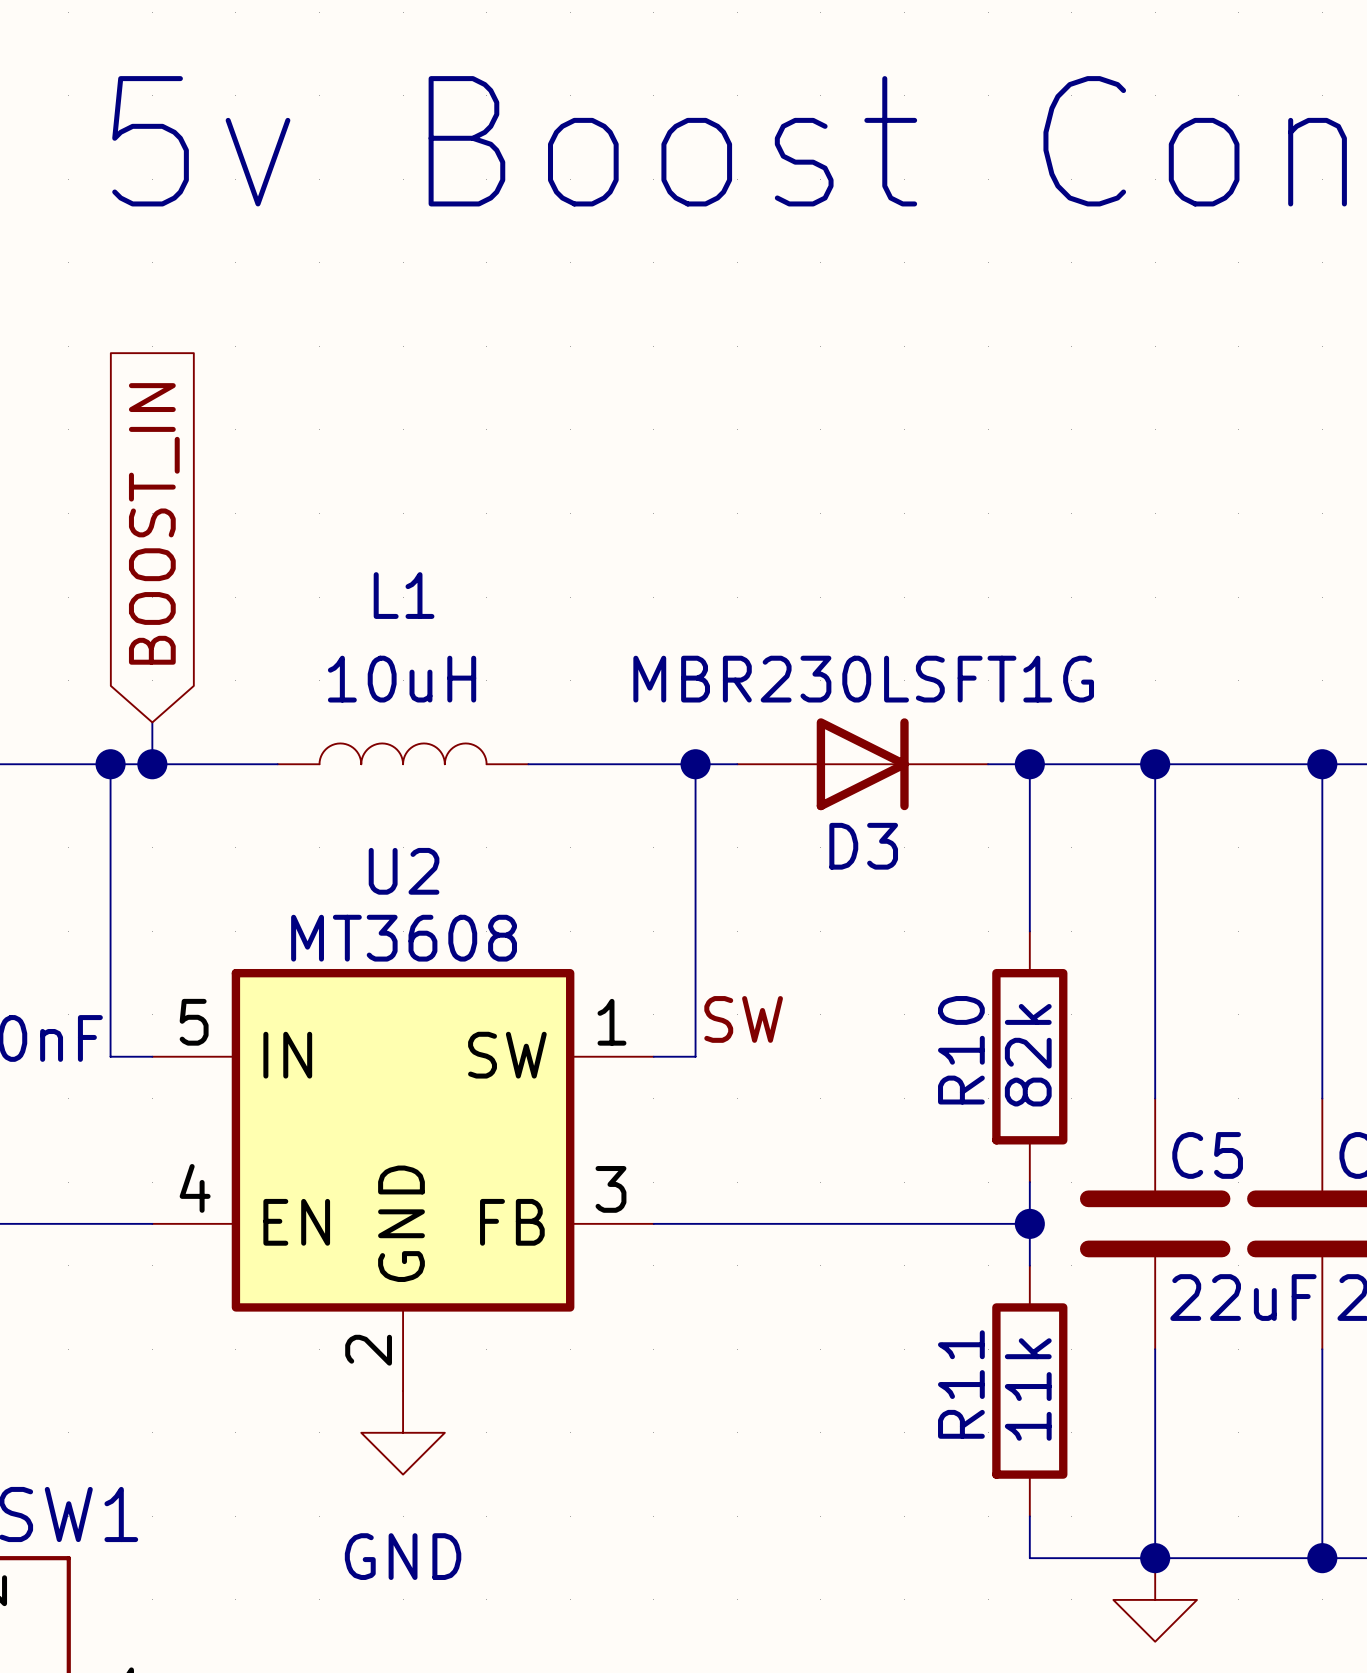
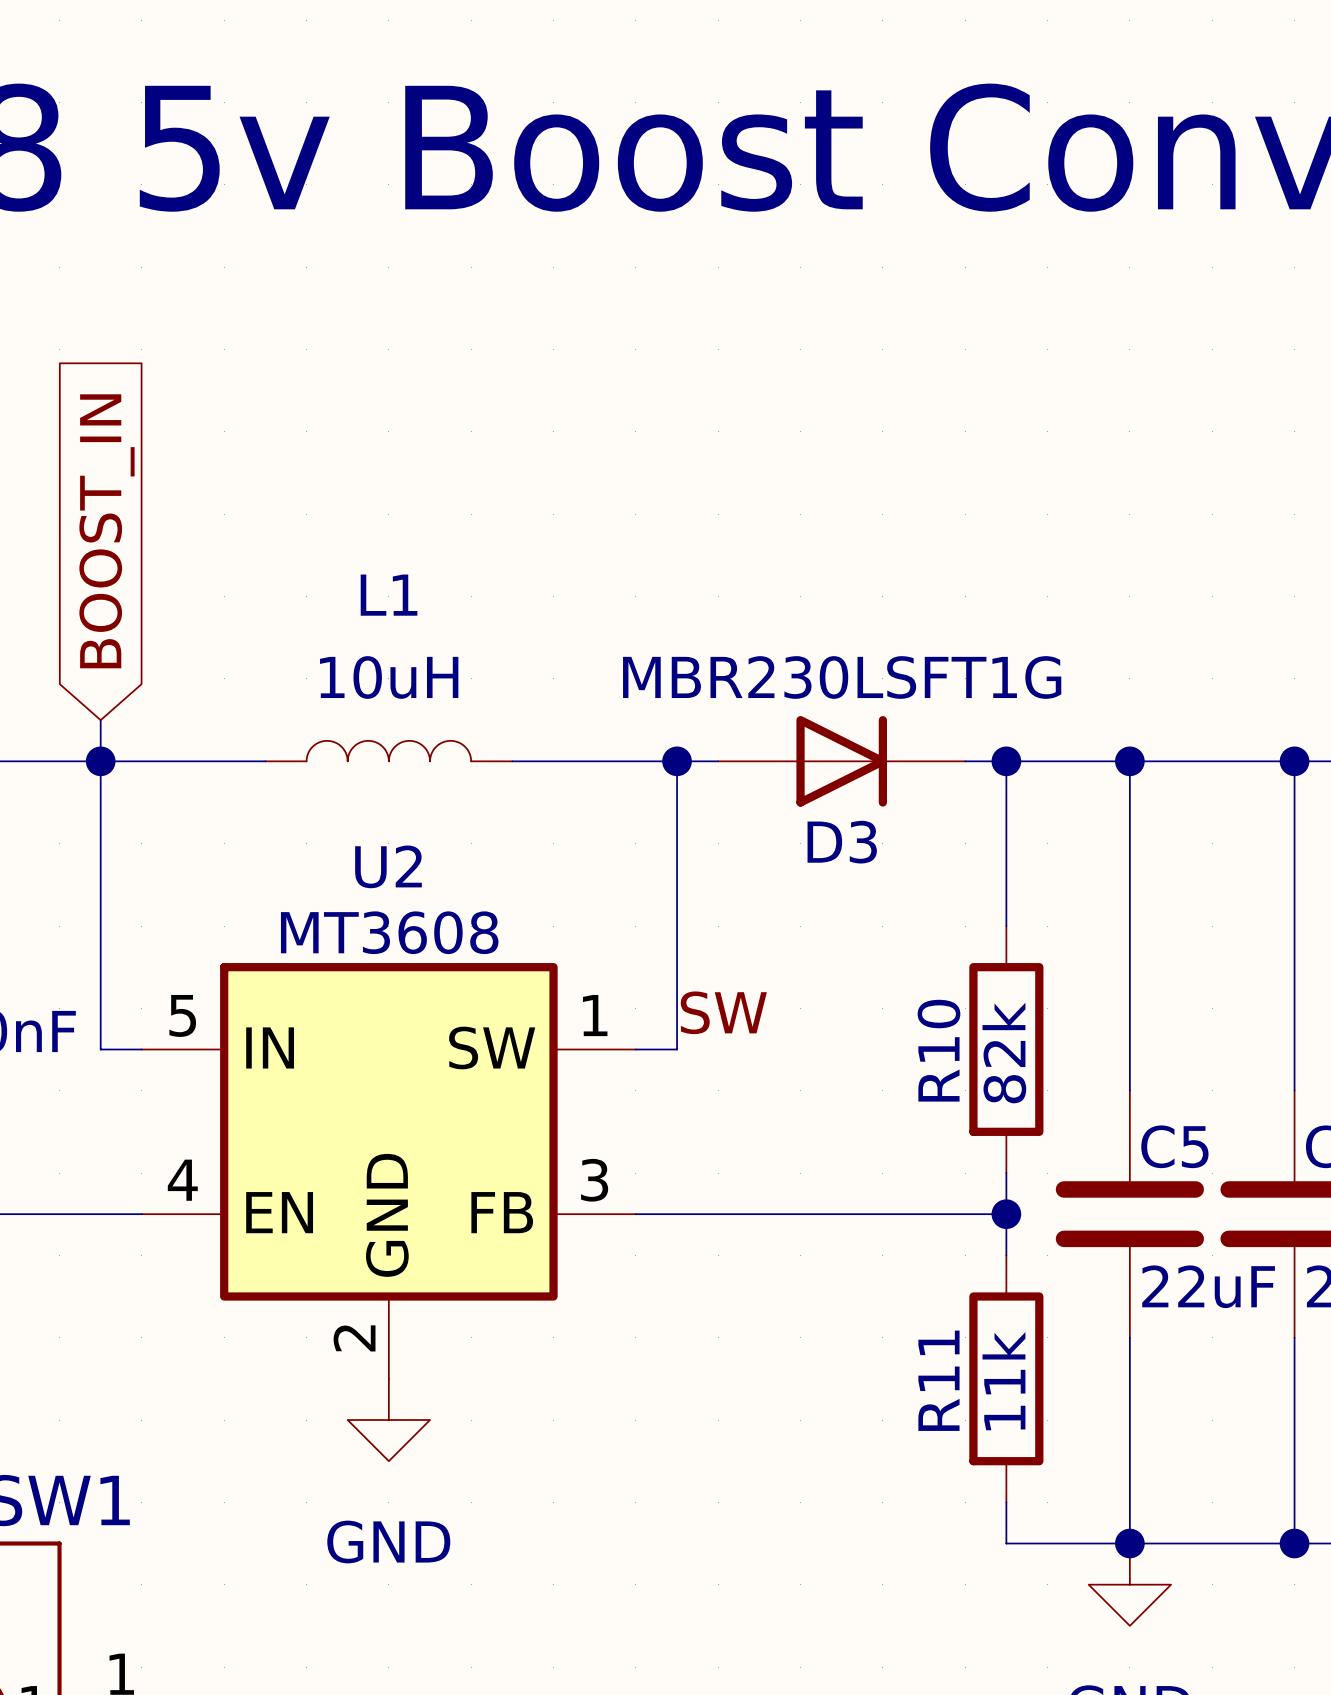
global label position: BOOST_IN (154, 523) -> BOOST_IN (106, 531)
wire: (152, 722) (152, 764) -> (100, 720) (100, 761)
junction: (152, 764) -> none

